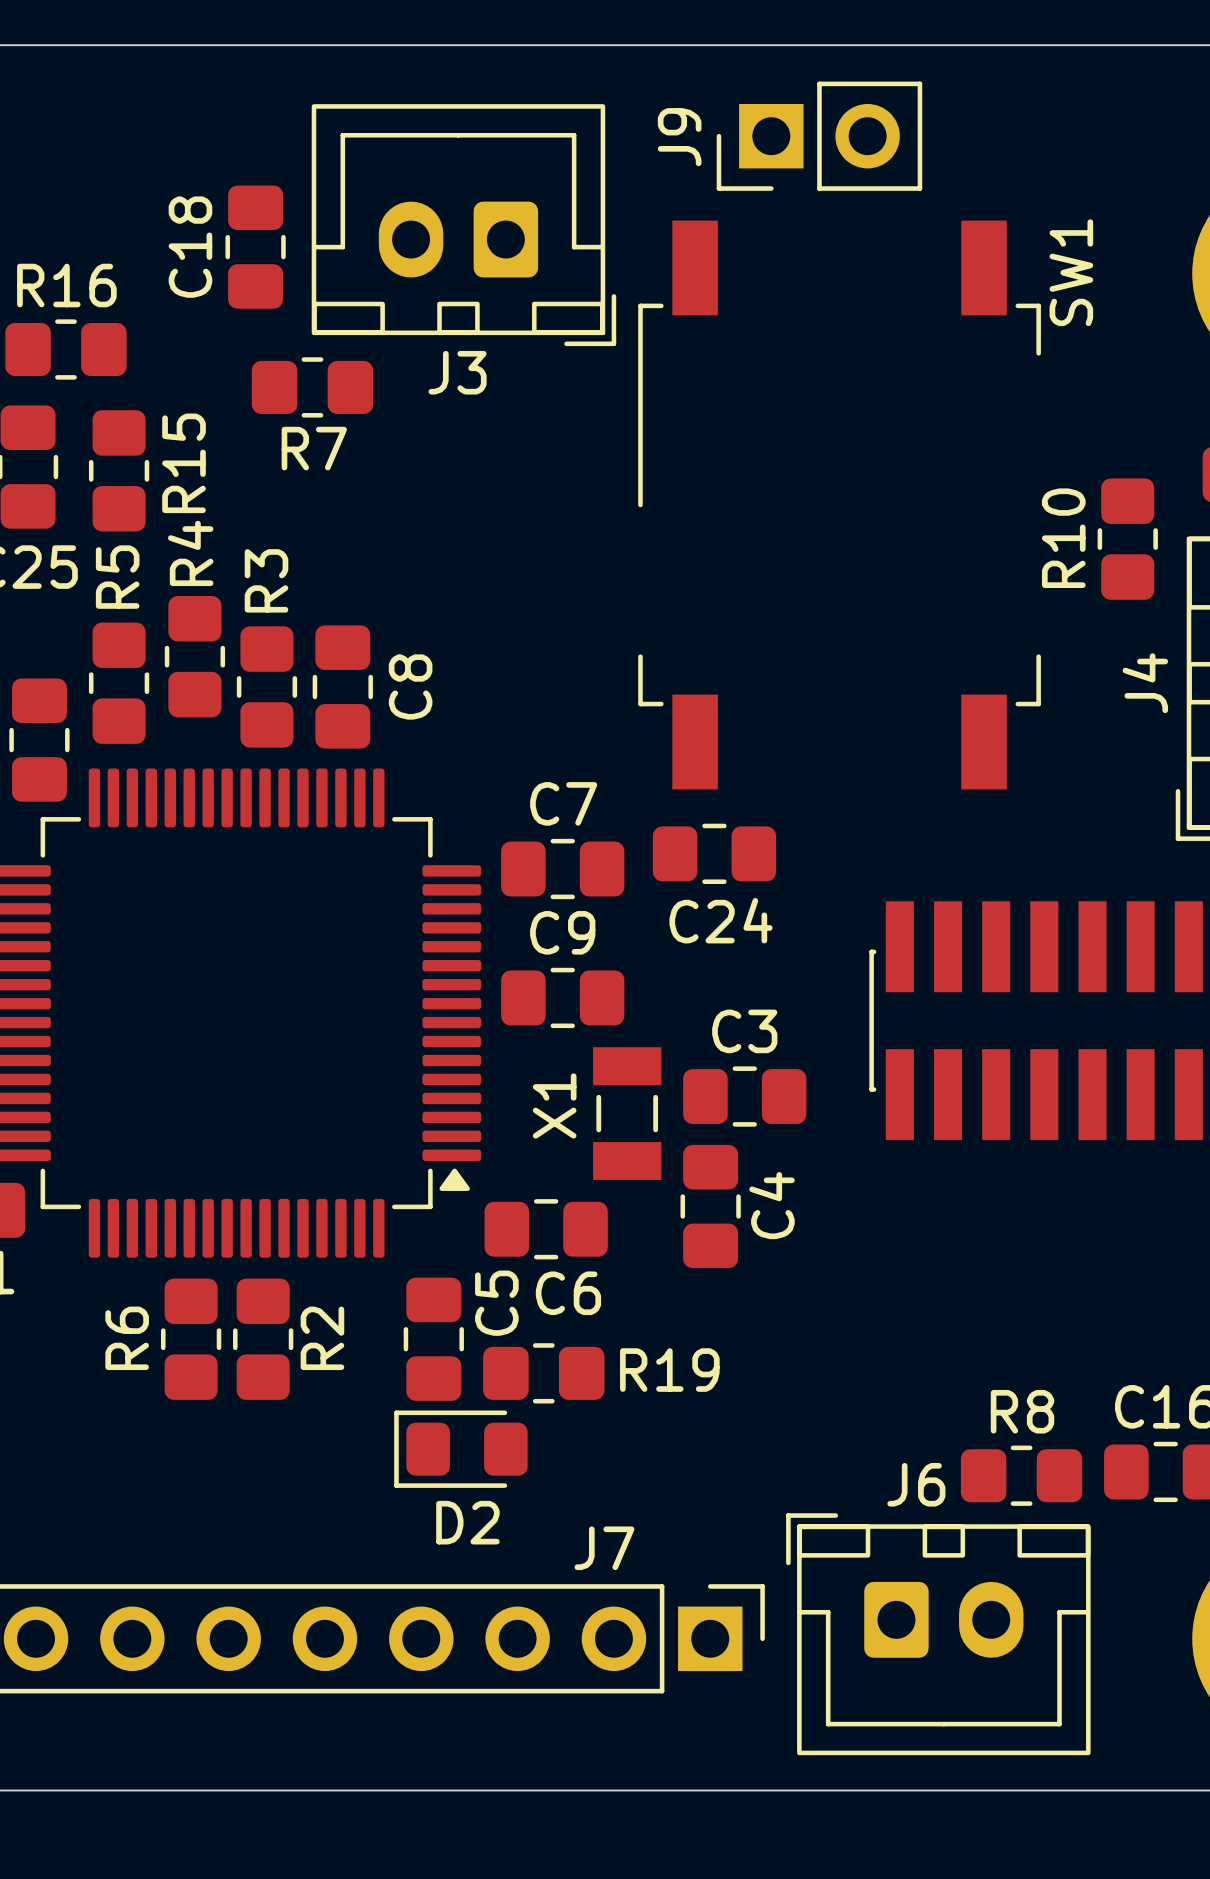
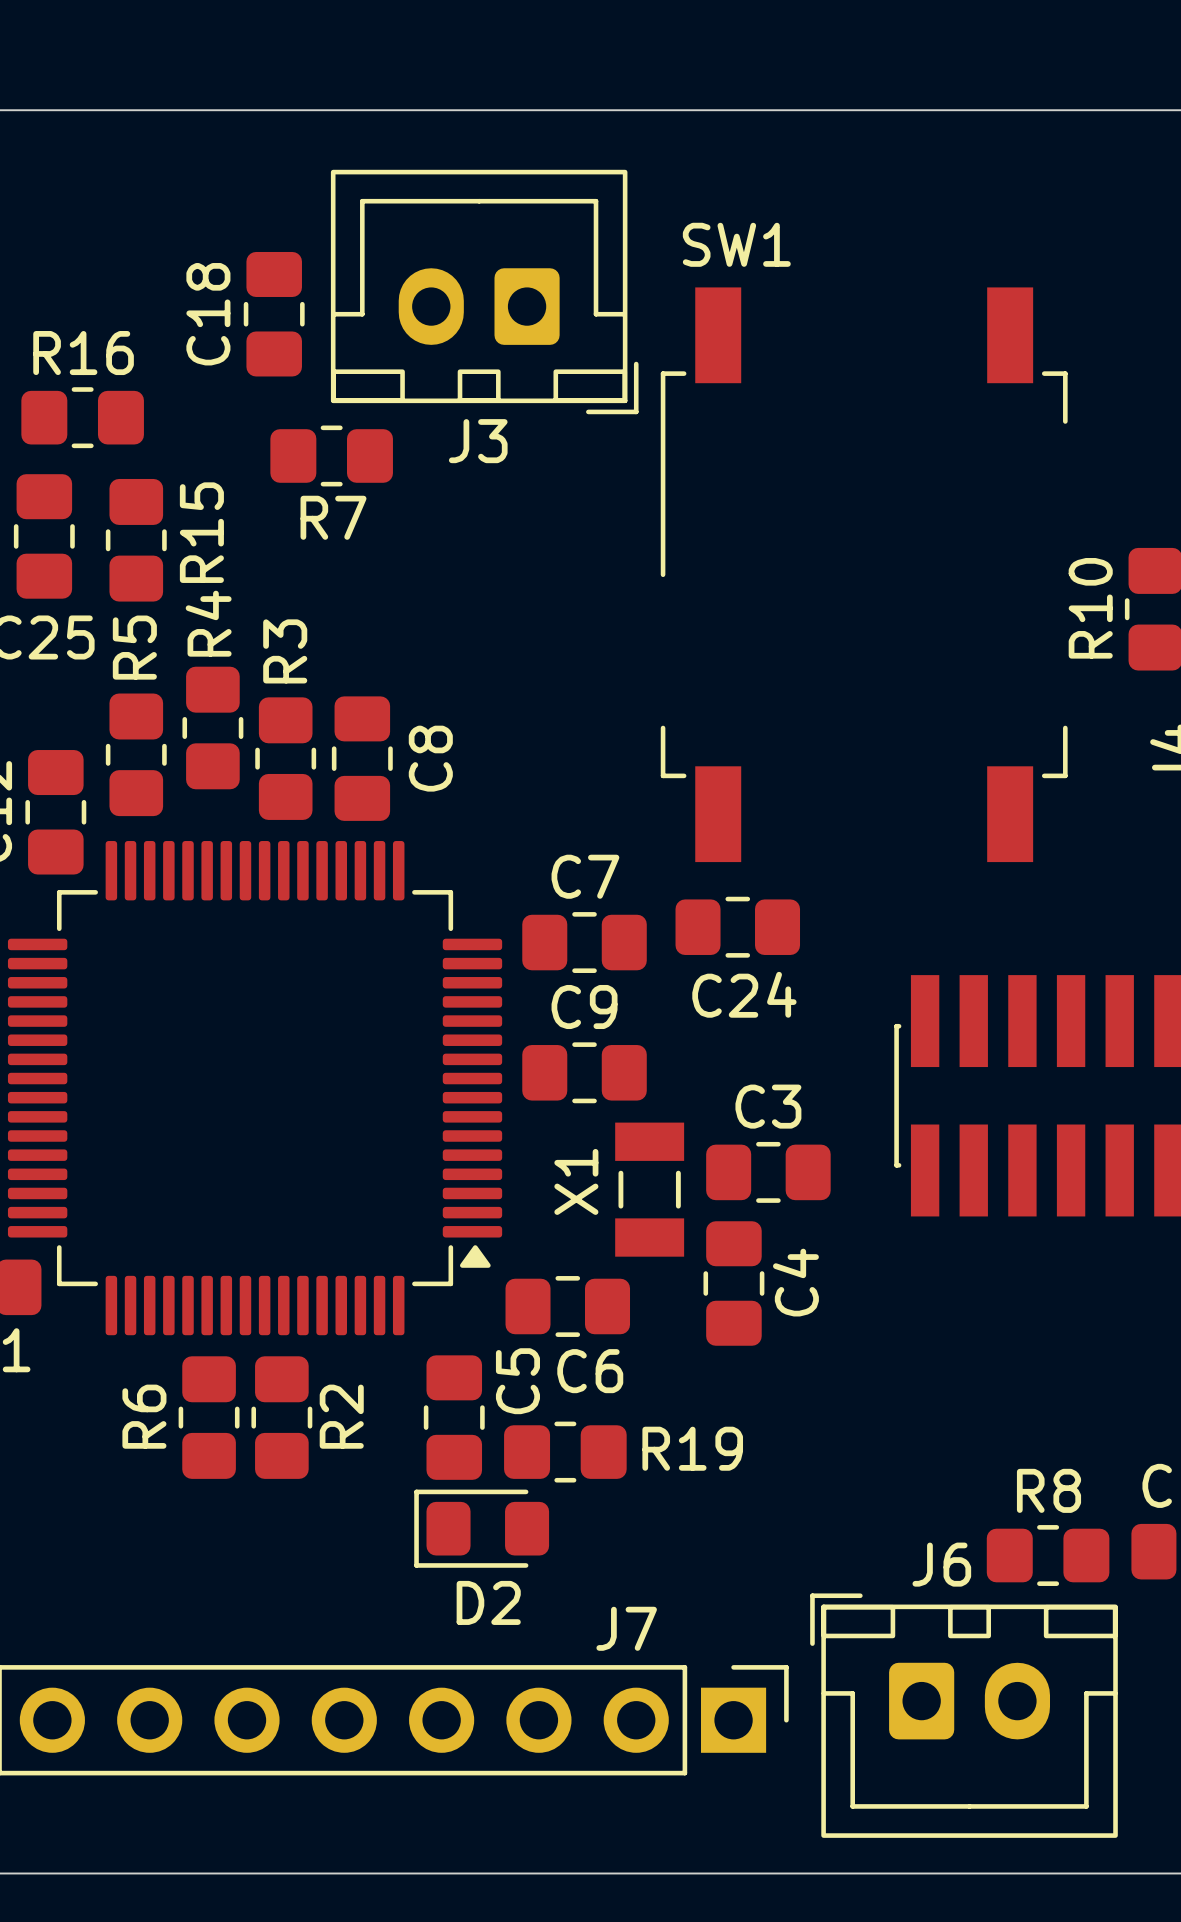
J9: (819, 136) -> none
SW1 name rotation: 0° (1071, 272) -> 90° clockwise (736, 244)
SW1 name position: SW1 (1071, 272) -> SW1 (736, 244)

